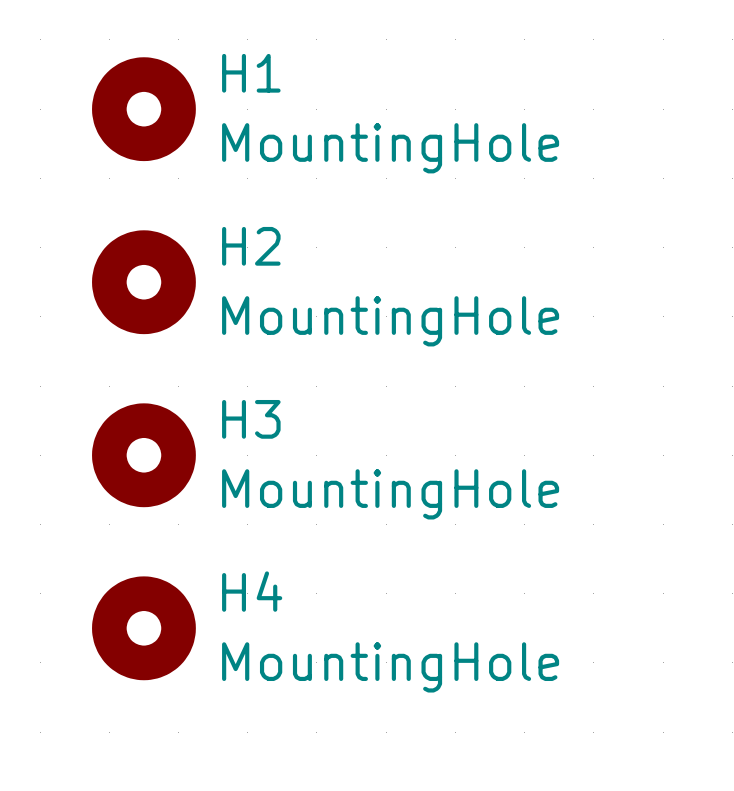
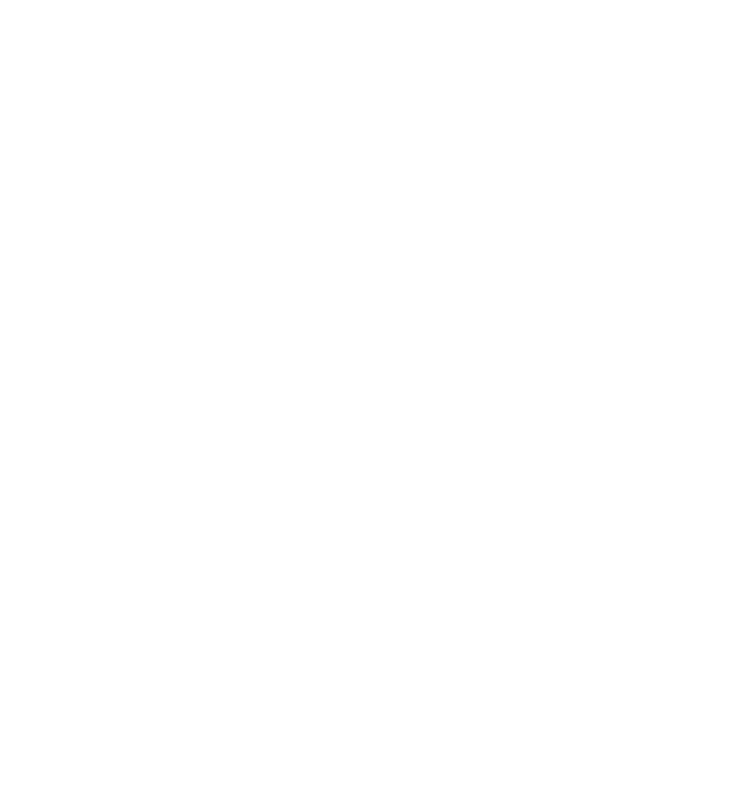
H1: MountingHole (143, 109) -> none
H2: MountingHole (143, 282) -> none
H3: MountingHole (143, 455) -> none
H4: MountingHole (143, 628) -> none

